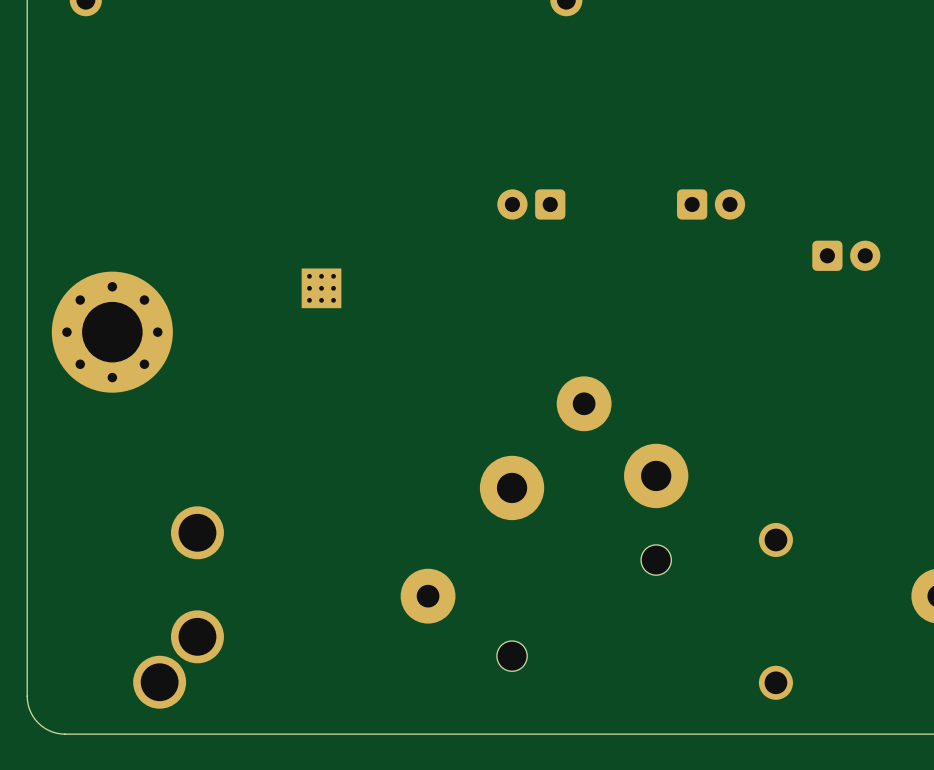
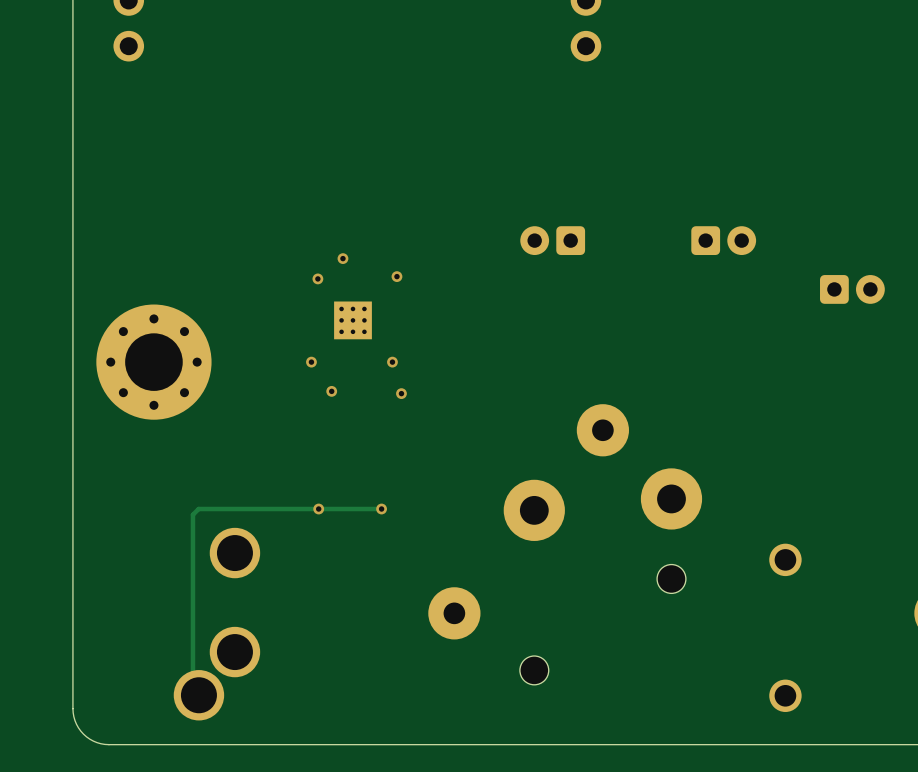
via: none -> (342, 258)
via: none -> (396, 276)
via: none -> (317, 278)
via: none -> (311, 362)
via: none -> (392, 362)
via: none -> (331, 391)
via: none -> (401, 393)
via: none -> (318, 509)
track: none -> (381, 509) (198, 509) (192, 514) (192, 680) (198, 686) (198, 695)
via: none -> (381, 509)

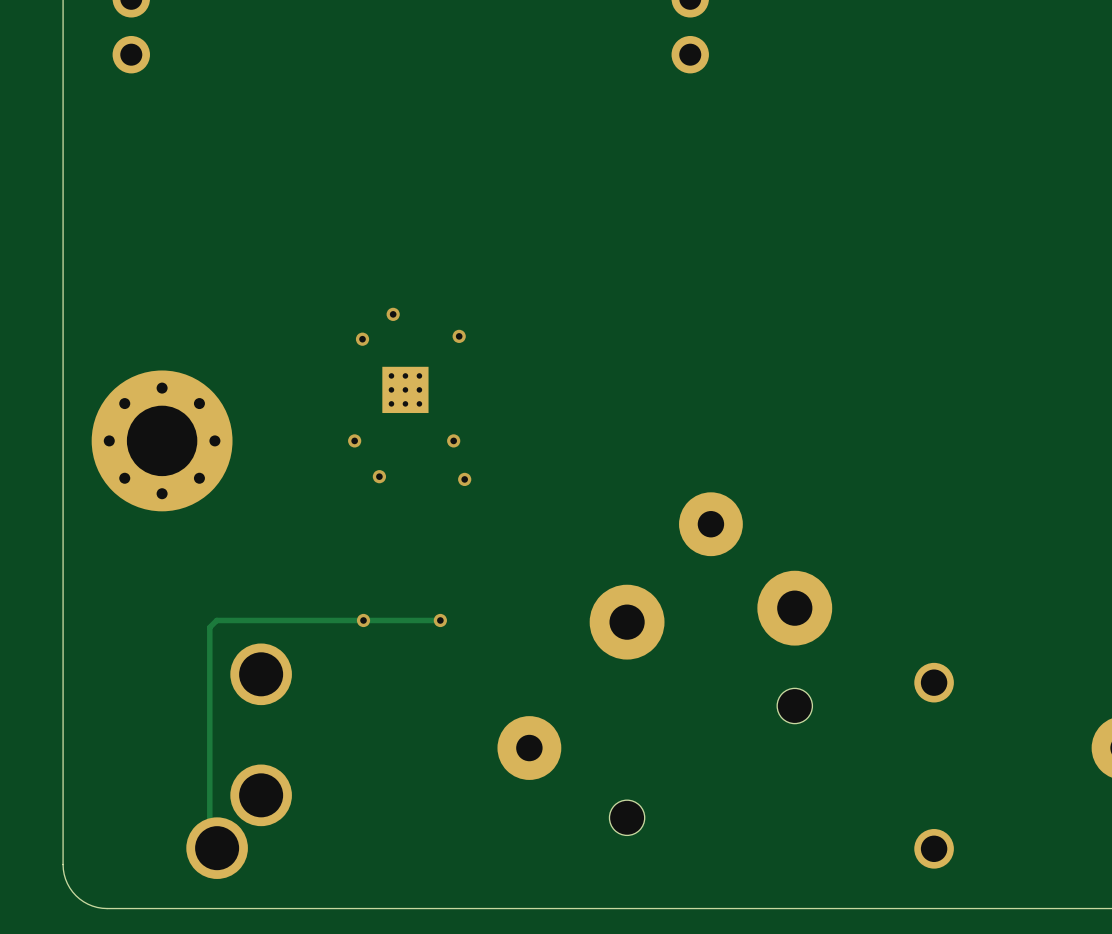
part: (552, 240) -> none
part: (723, 240) -> none
part: (852, 289) -> none

